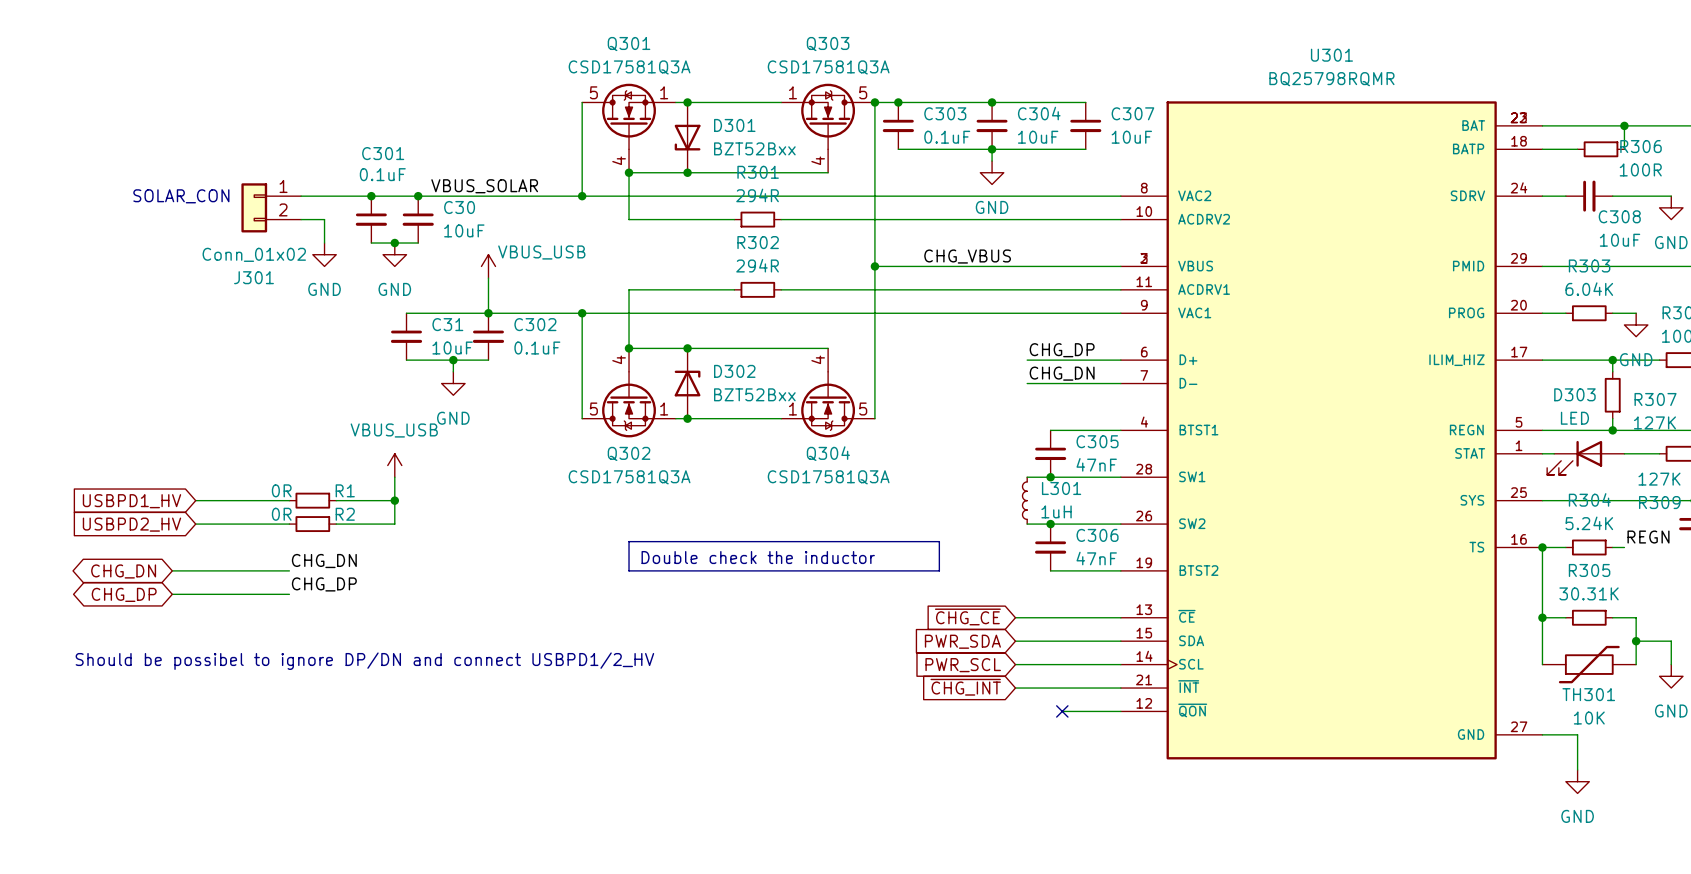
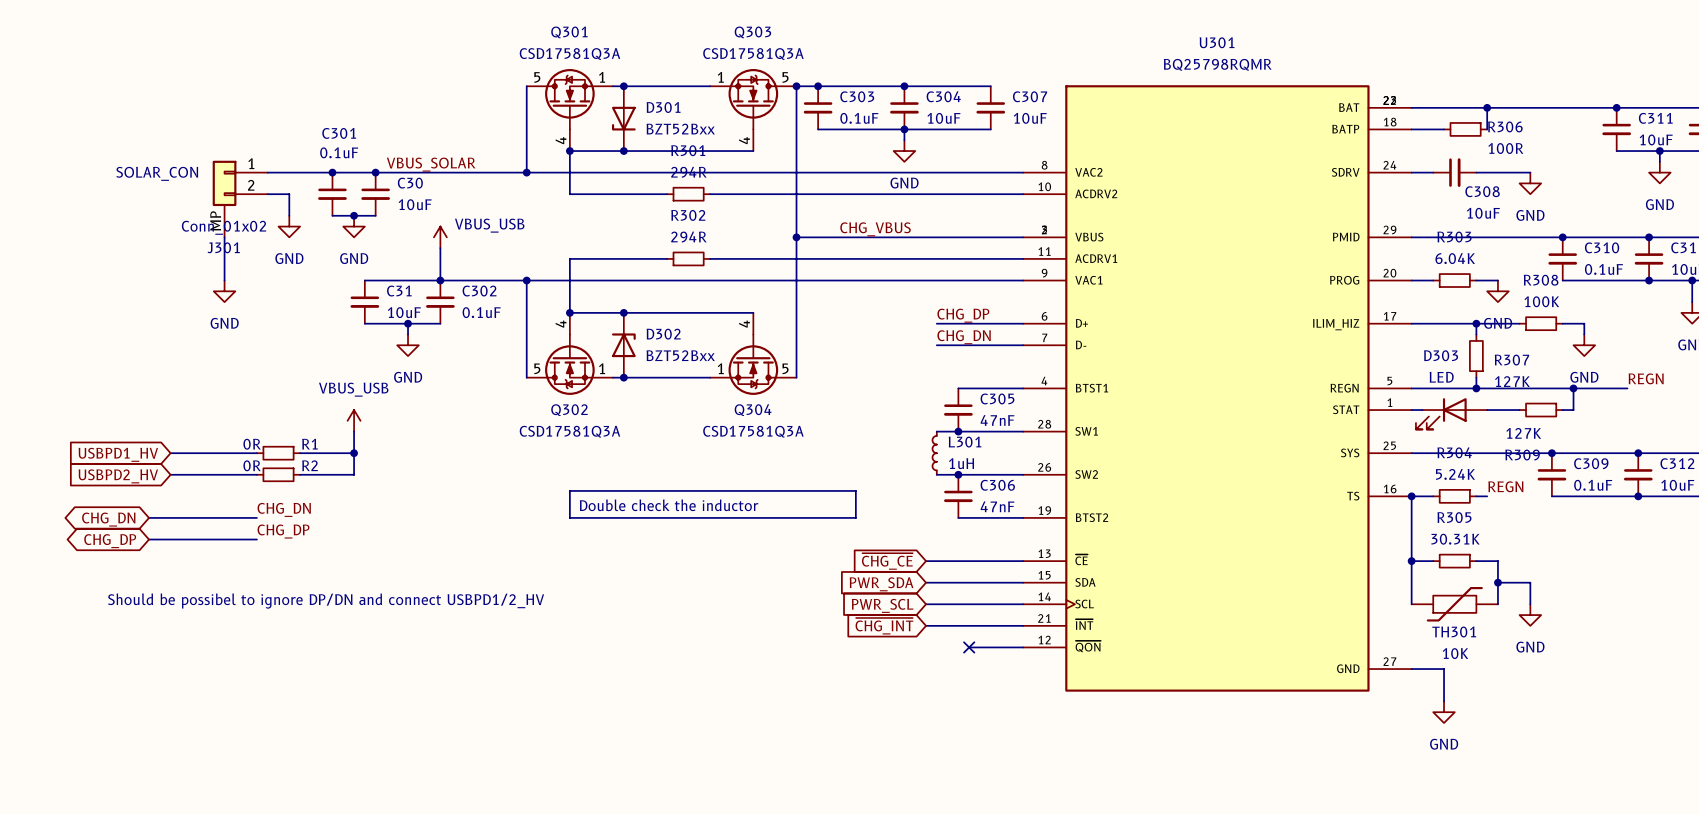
J301 symbol: [241, 183, 302, 233] -> [212, 160, 268, 238]
wire: none -> (224, 237) (224, 280)
power symbol: none -> GND (224, 291)

